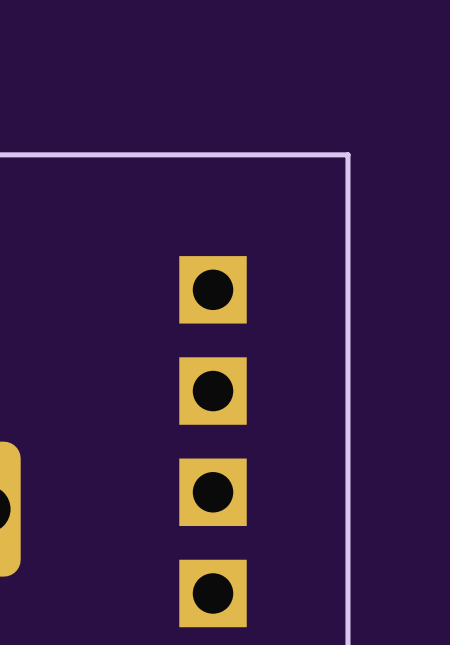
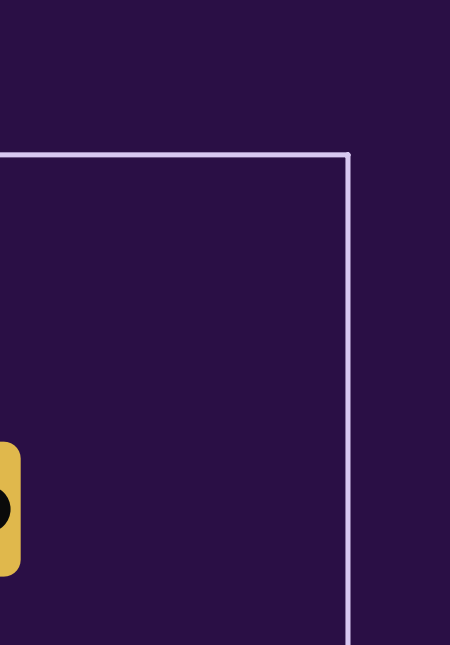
part: (213, 289) -> none
part: (213, 391) -> none
part: (213, 492) -> none
part: (213, 593) -> none

